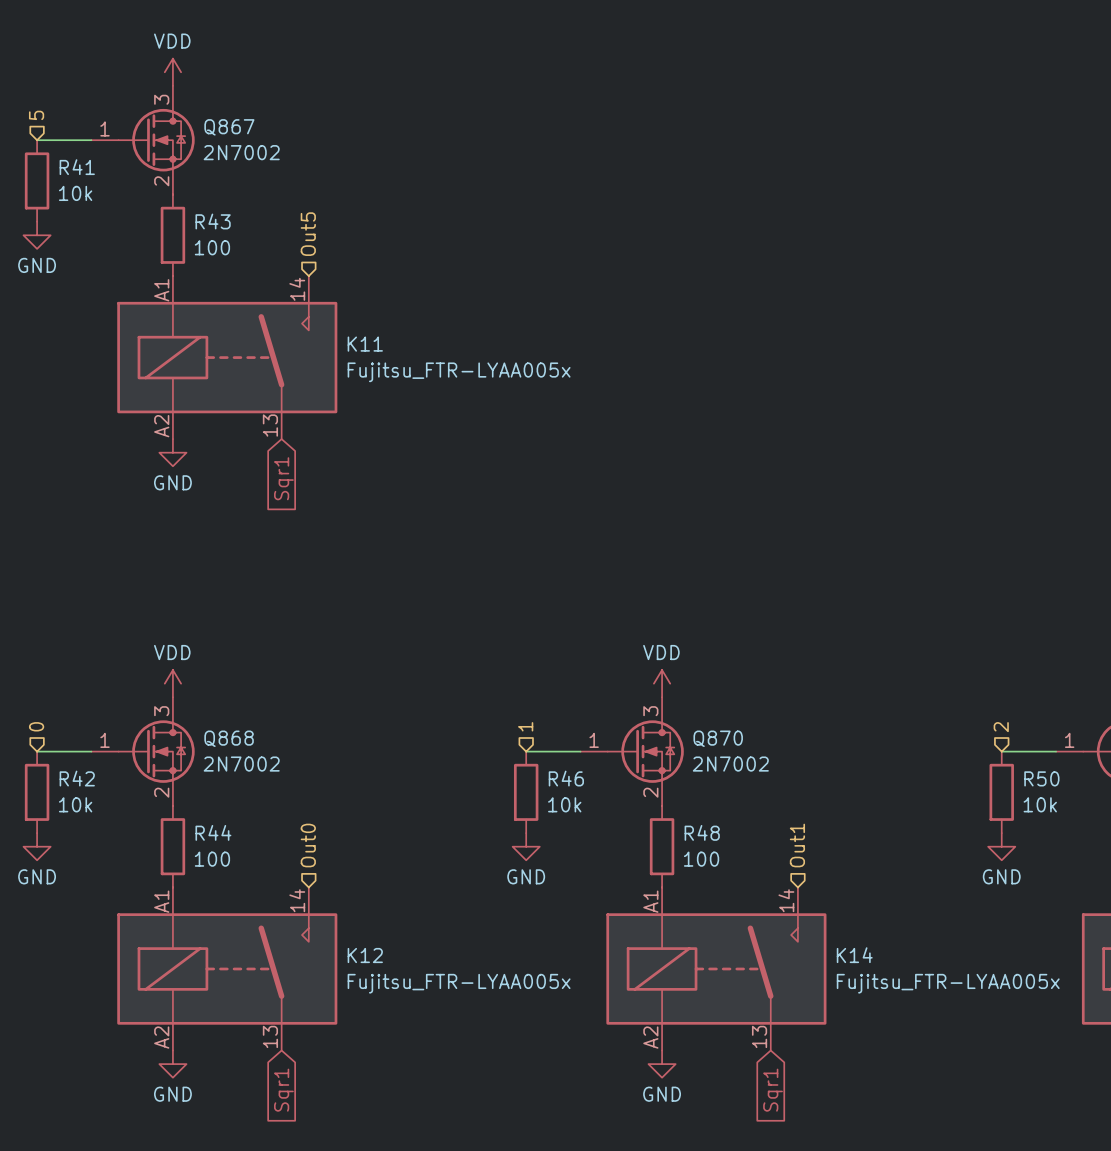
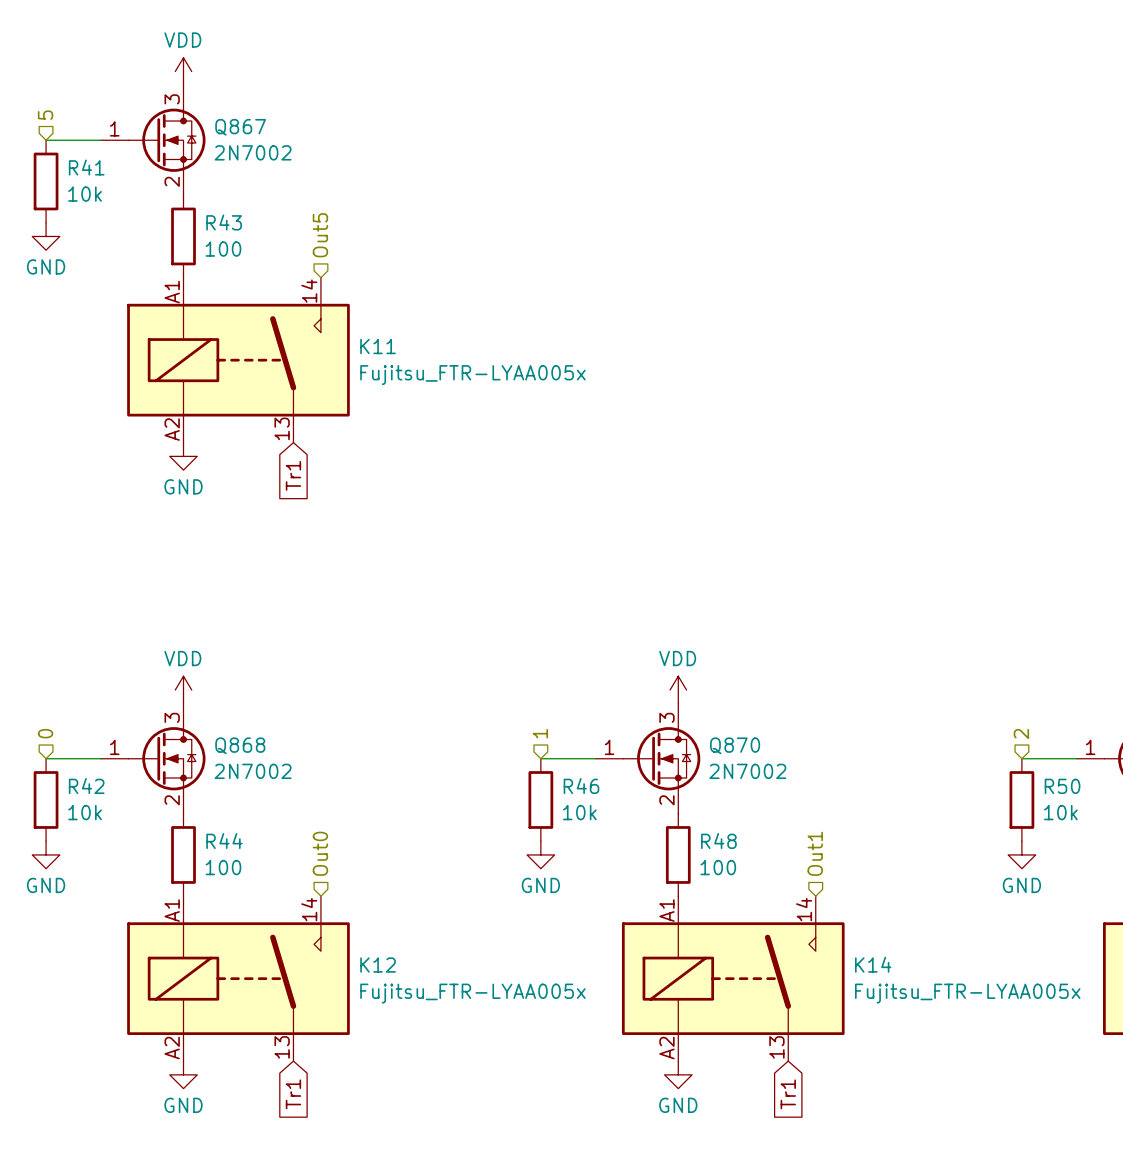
global label: Sqr1 (283, 478) -> Tr1 (293, 475)
global label: Sqr1 (283, 1090) -> Tr1 (293, 1094)
global label: Sqr1 (773, 1090) -> Tr1 (788, 1094)

